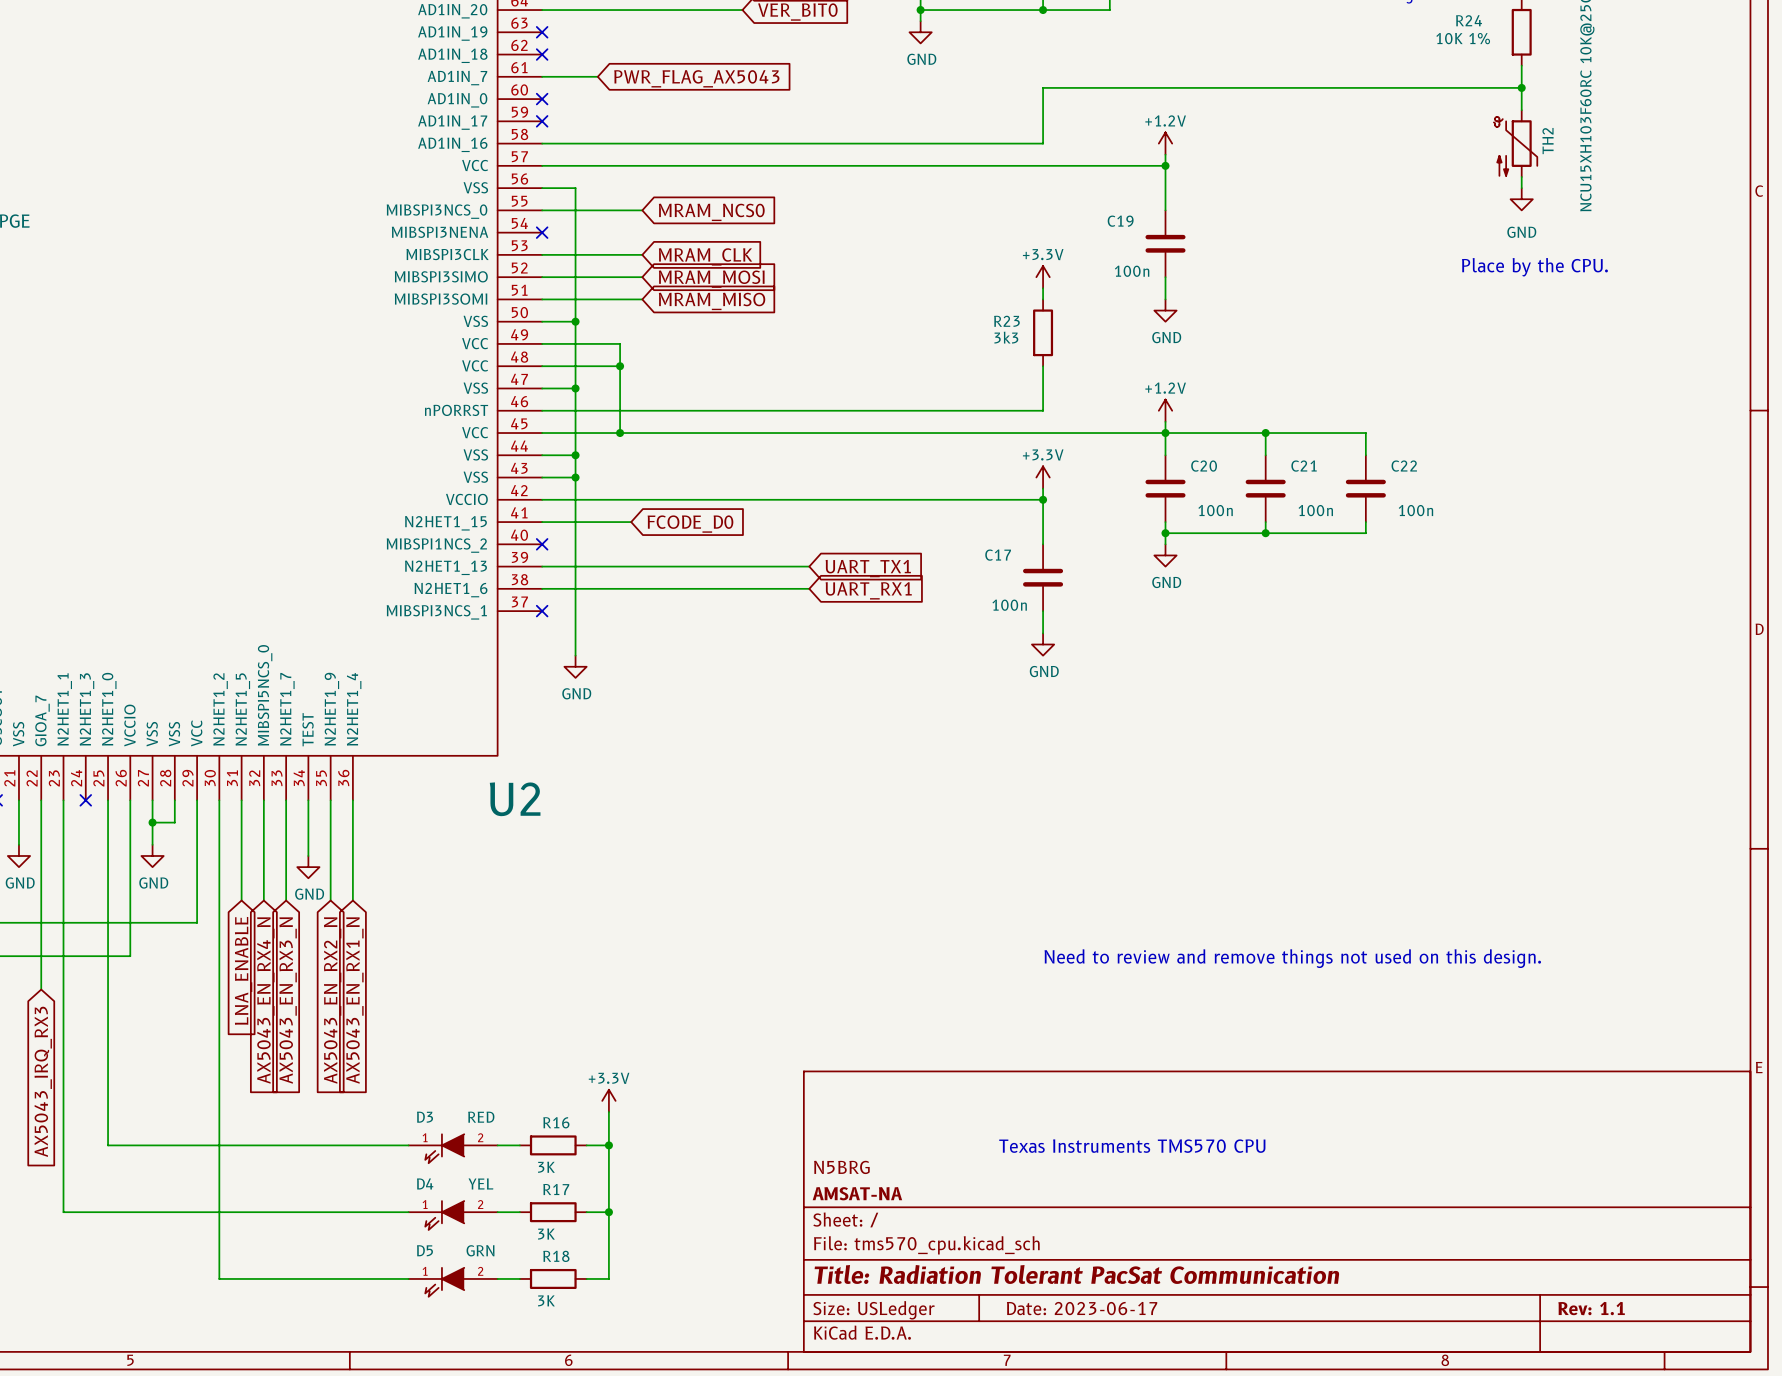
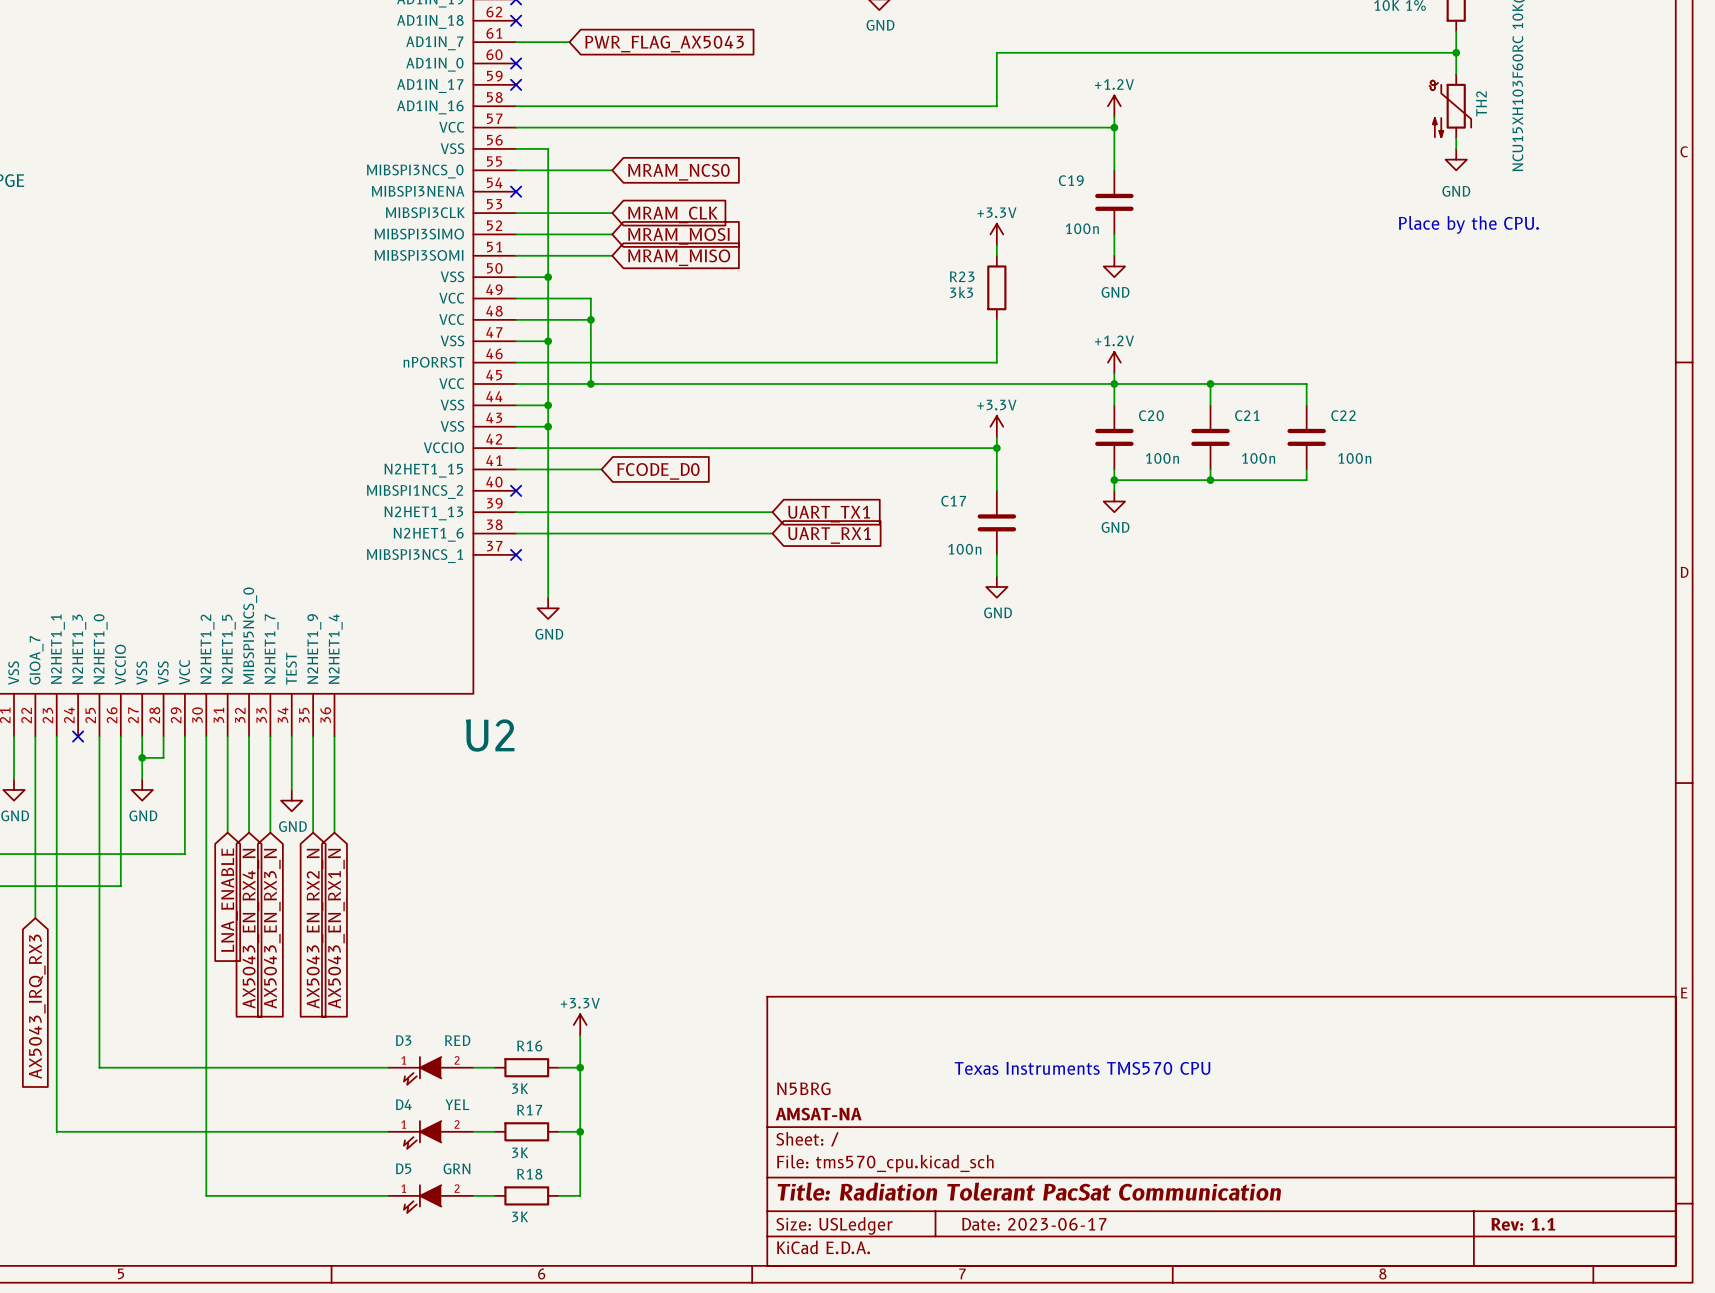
text: Need to review and remove things not used on this design. (1292, 958) -> none

